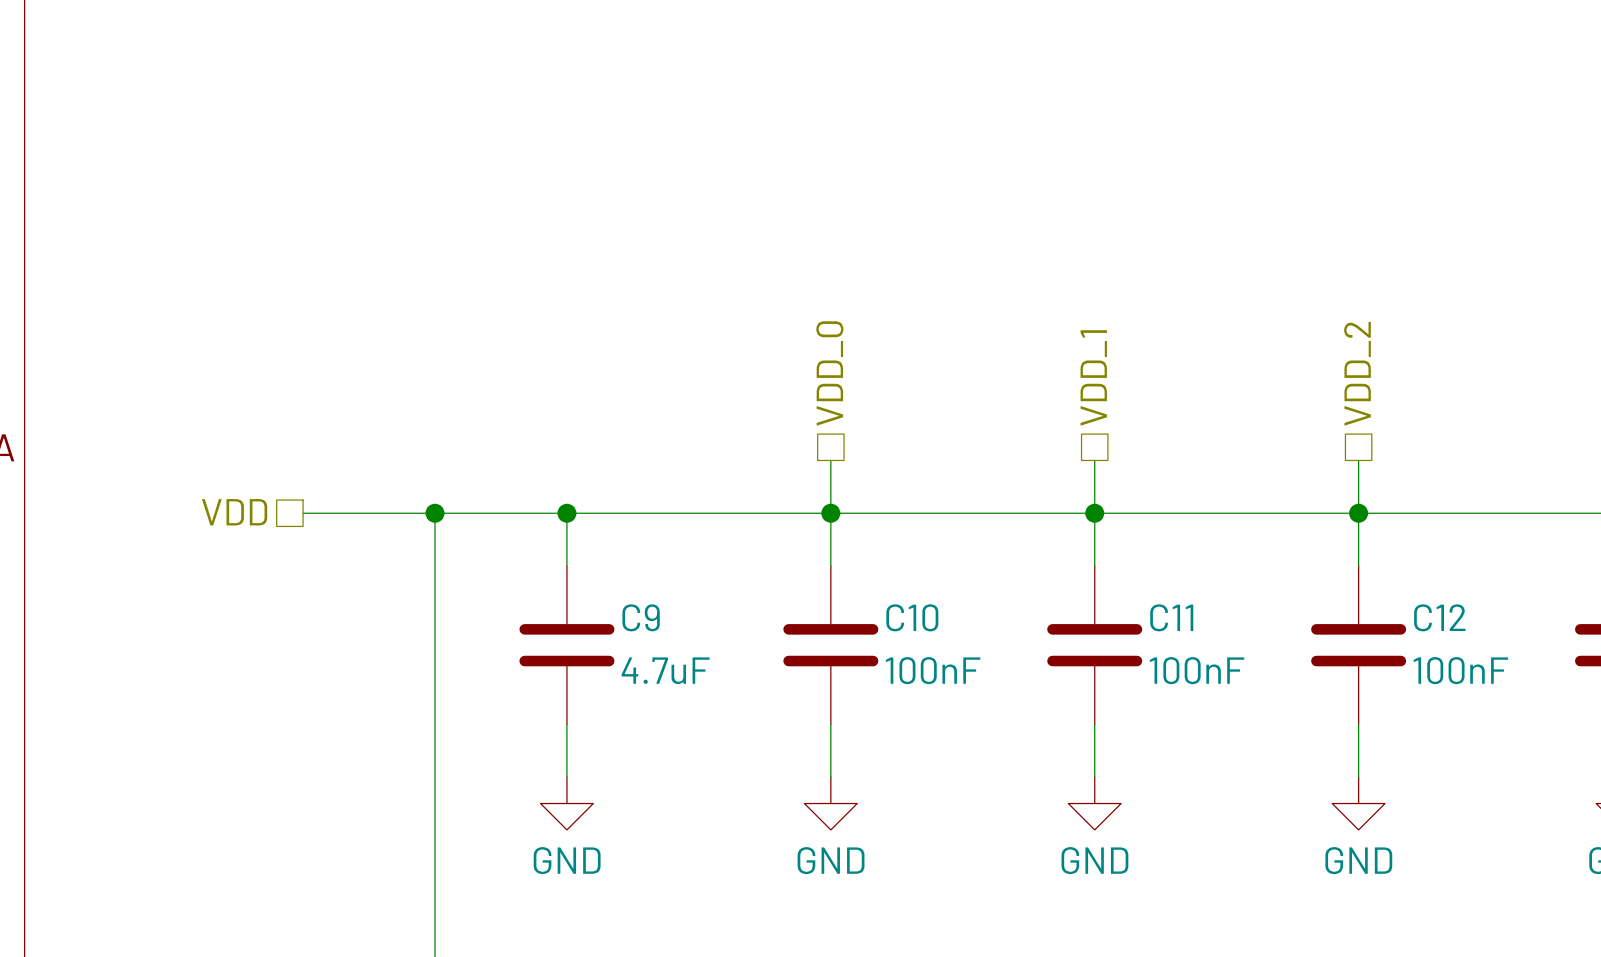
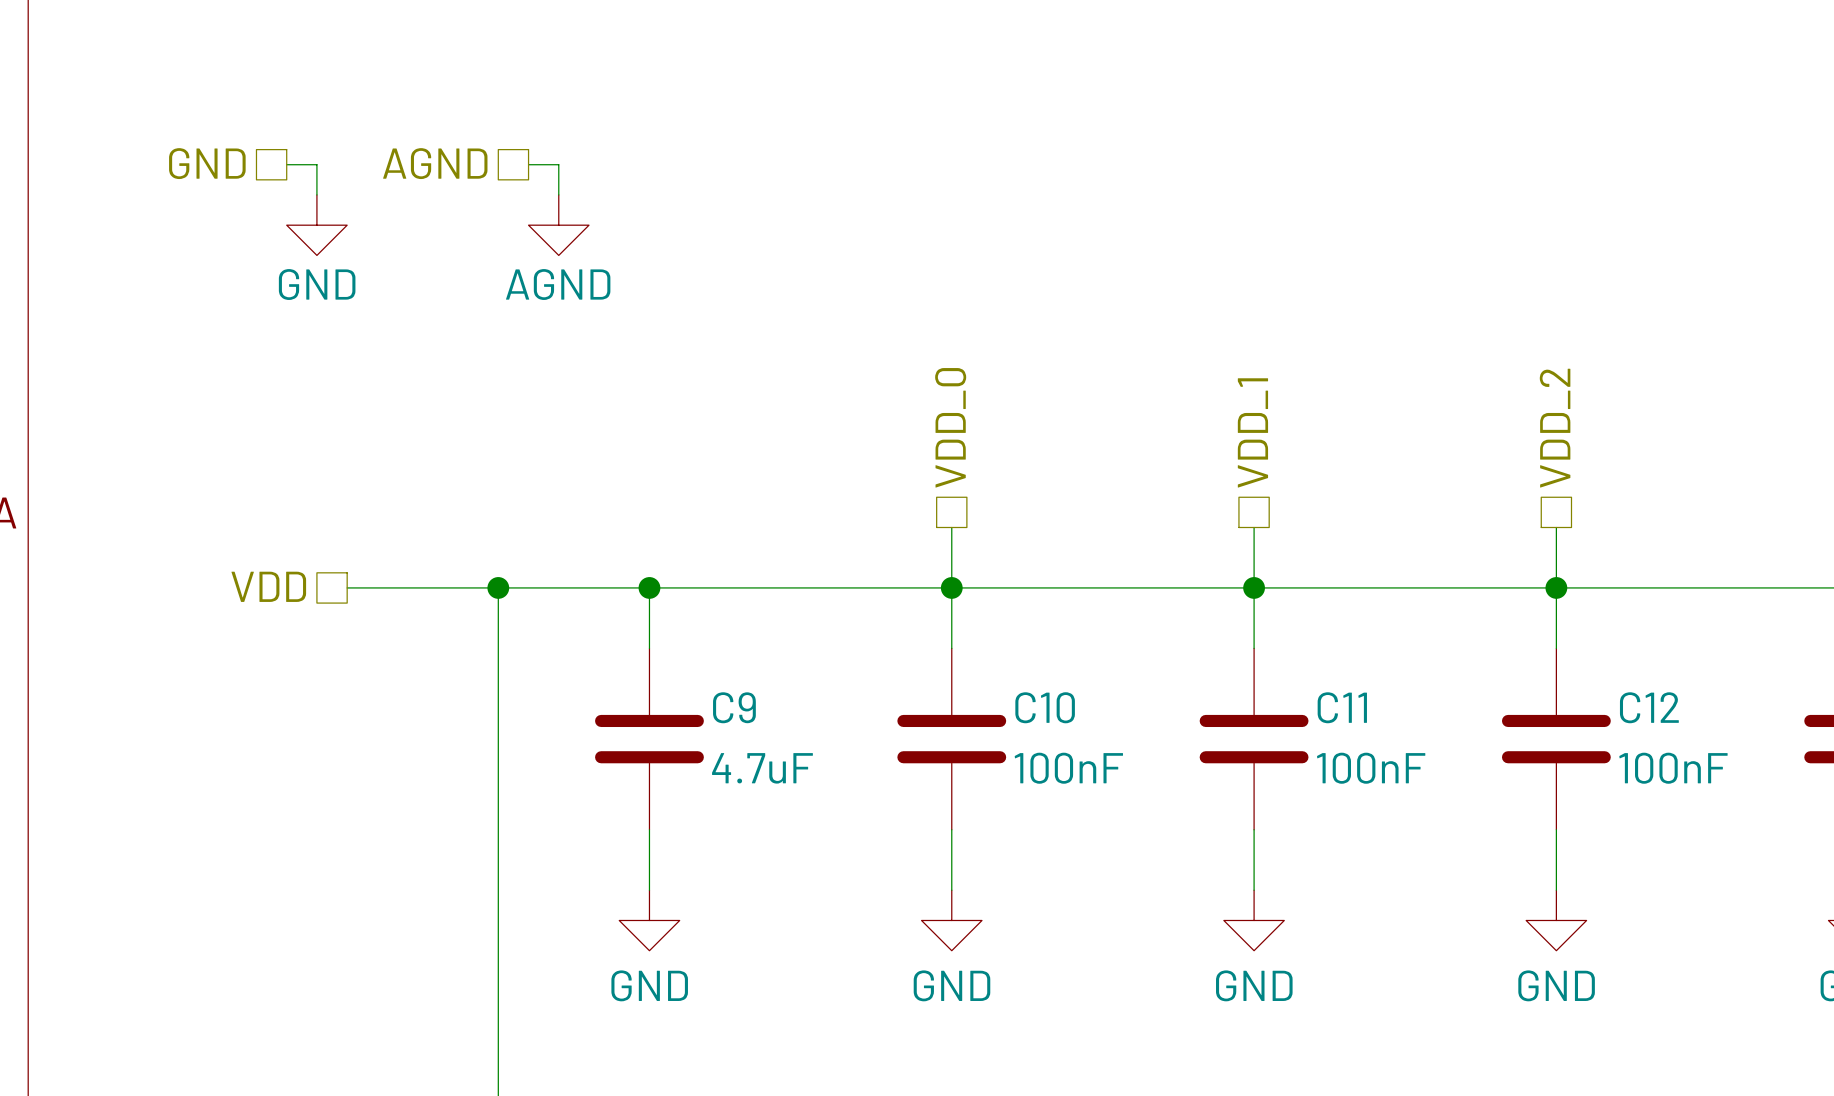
hierarchical label: none -> GND (207, 163)
hierarchical label: none -> AGND (435, 163)
wire: none -> (286, 164) (316, 164) (316, 194)
wire: none -> (528, 164) (558, 164) (558, 194)
power symbol: none -> GND (316, 225)
power symbol: none -> AGND (558, 225)

